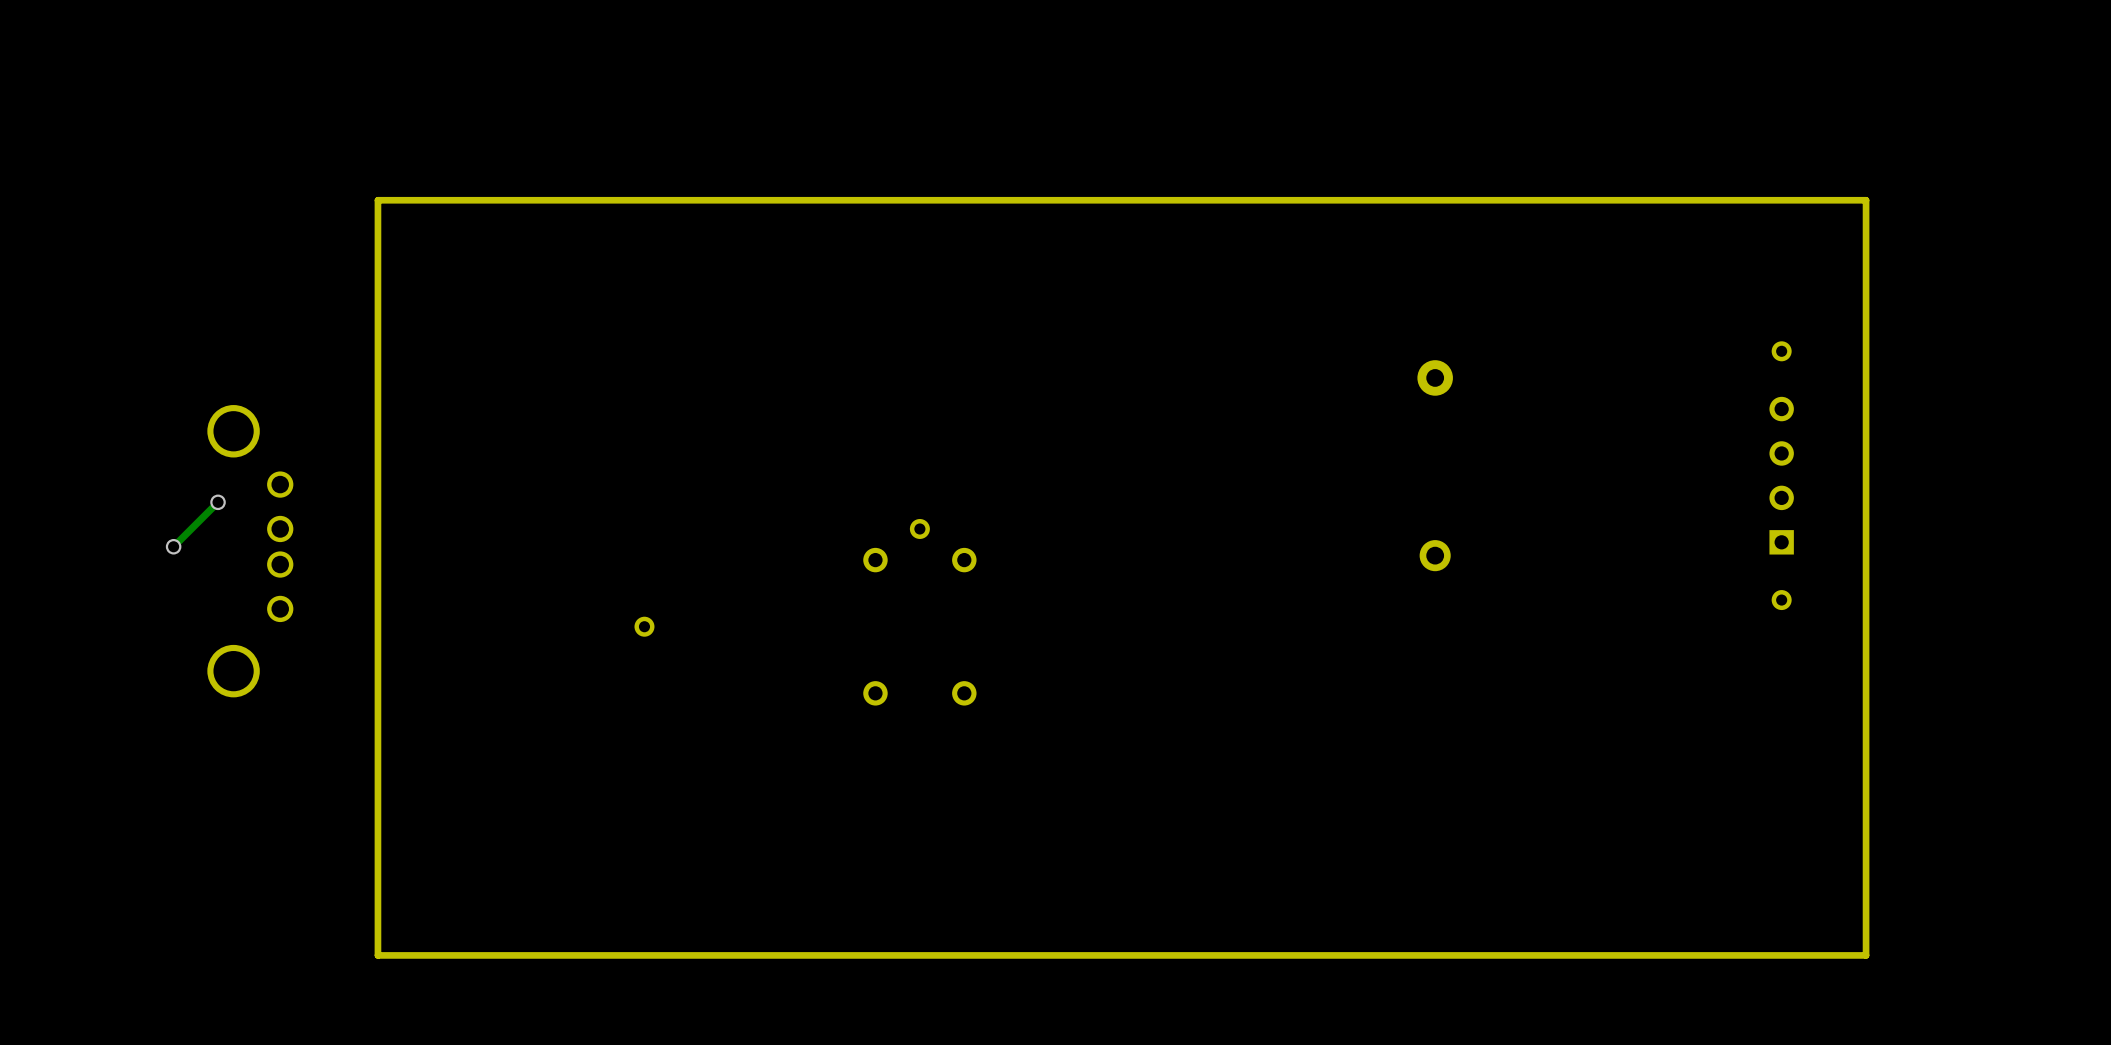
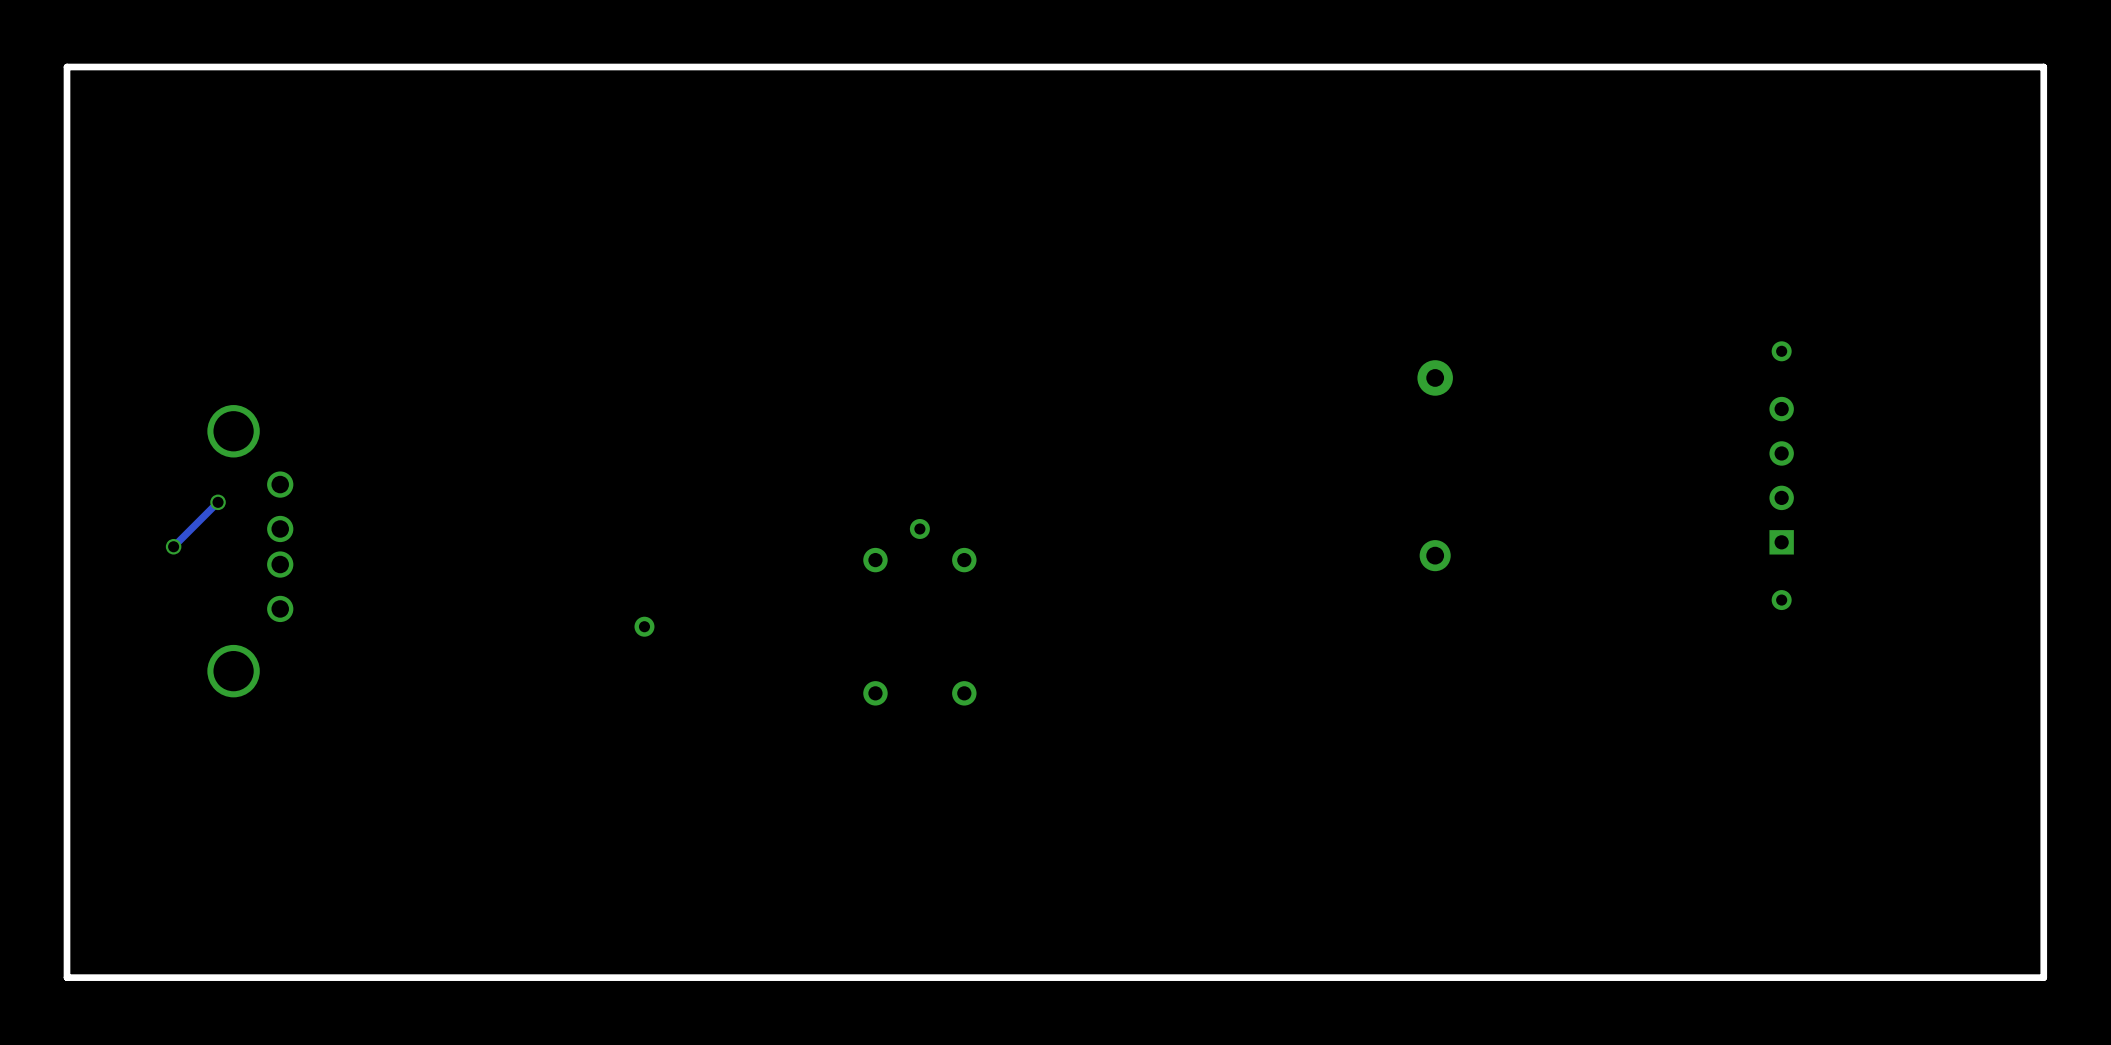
board edge: (1866, 200) (377, 200) (377, 955) (1866, 955) (1866, 200) -> (2043, 67) (2043, 977) (67, 977) (67, 67) (2043, 67)

